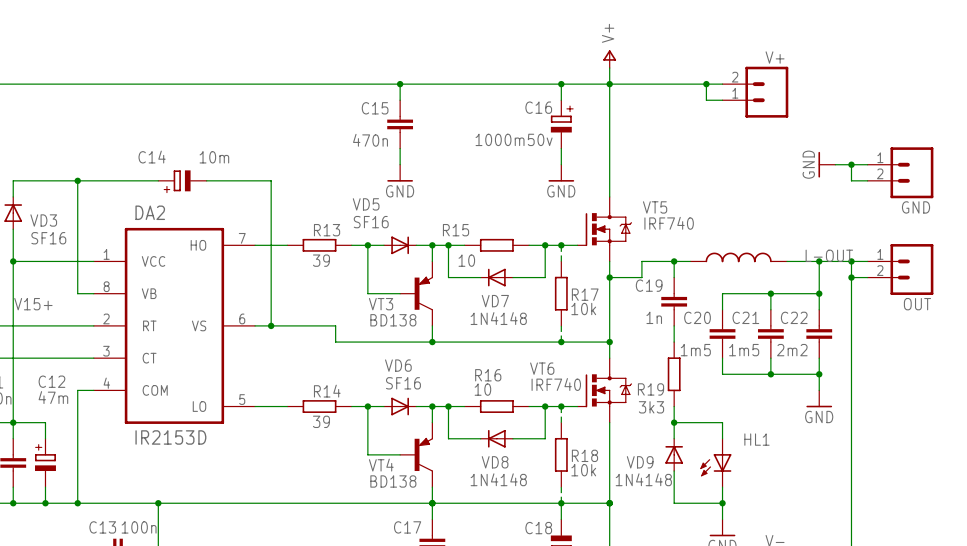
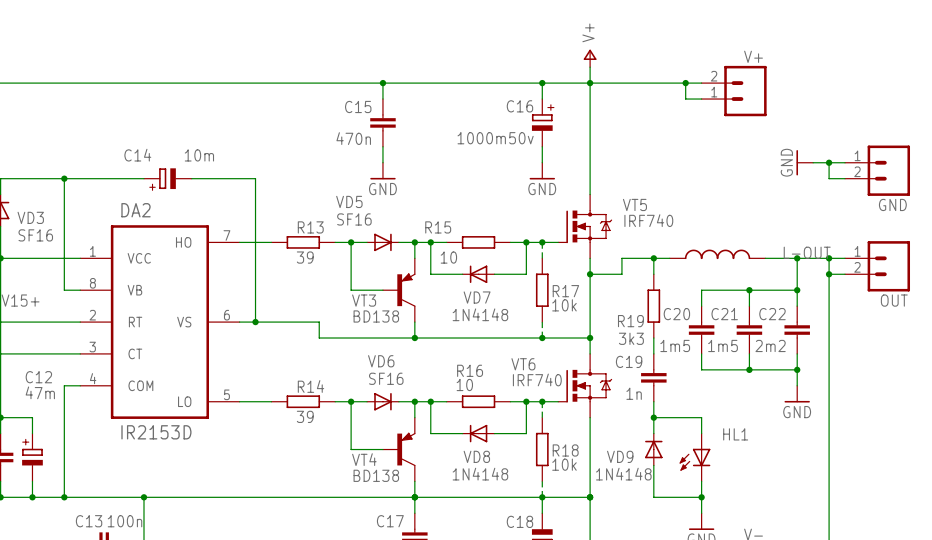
C19 position: (674, 301) -> (653, 377)
R19 position: (674, 374) -> (653, 306)

